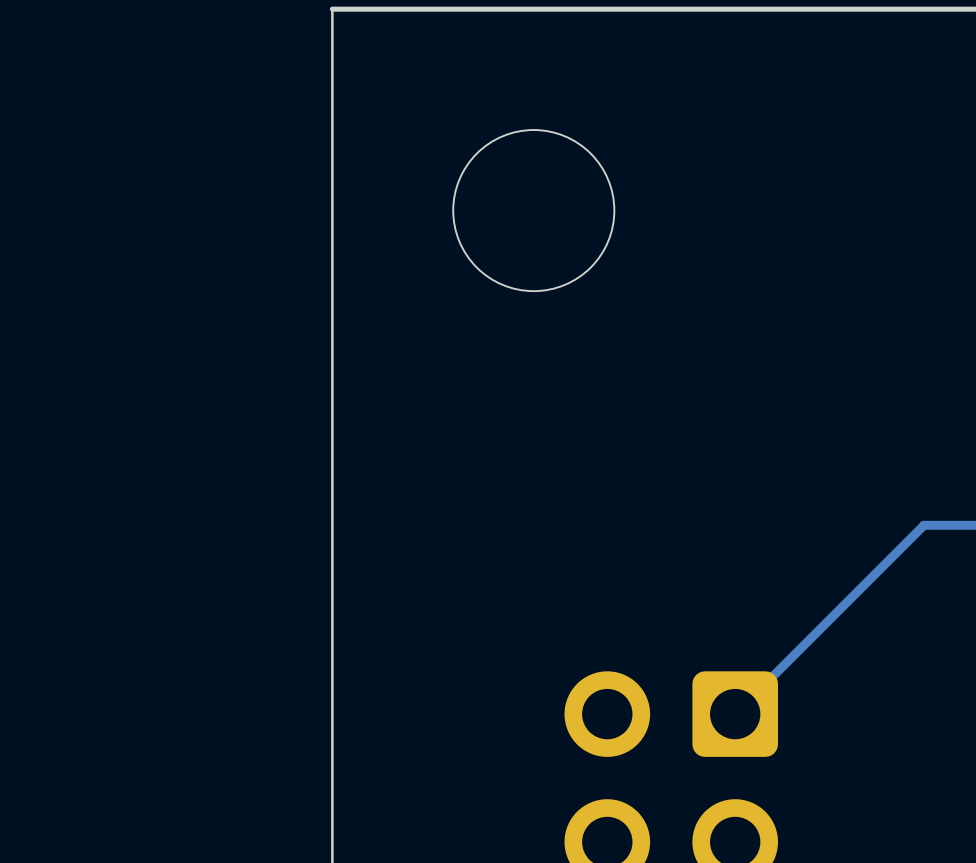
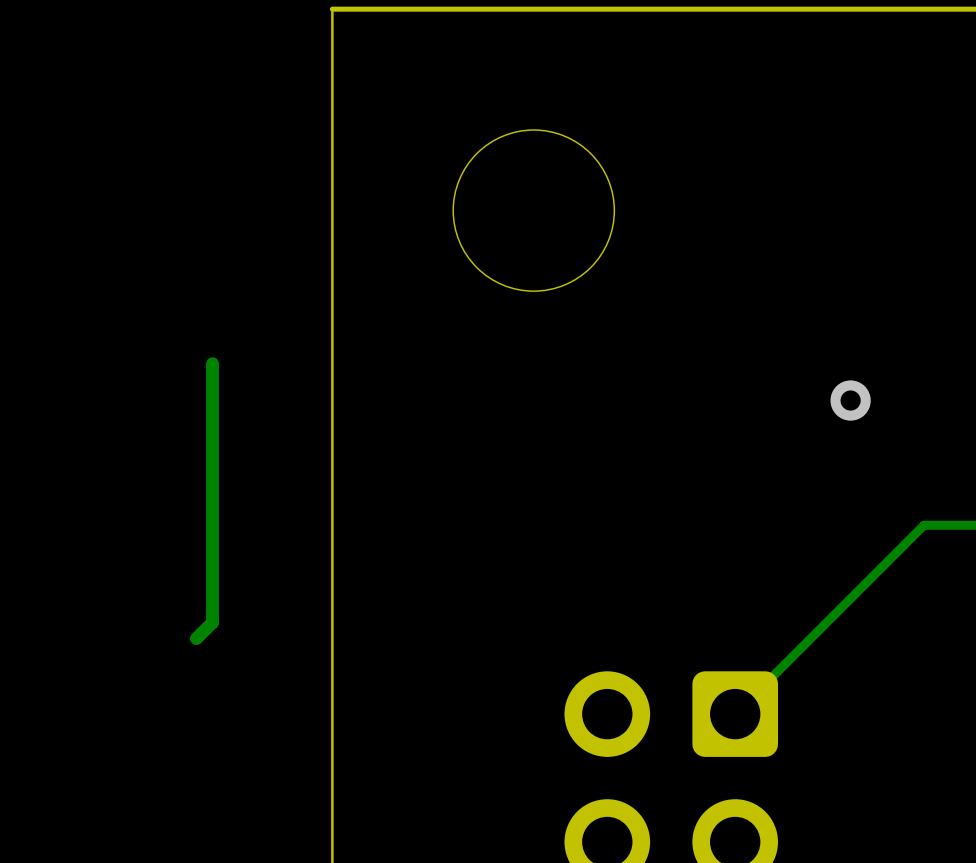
track: none -> (212, 363) (212, 622) (196, 638)
via: none -> (850, 400)

